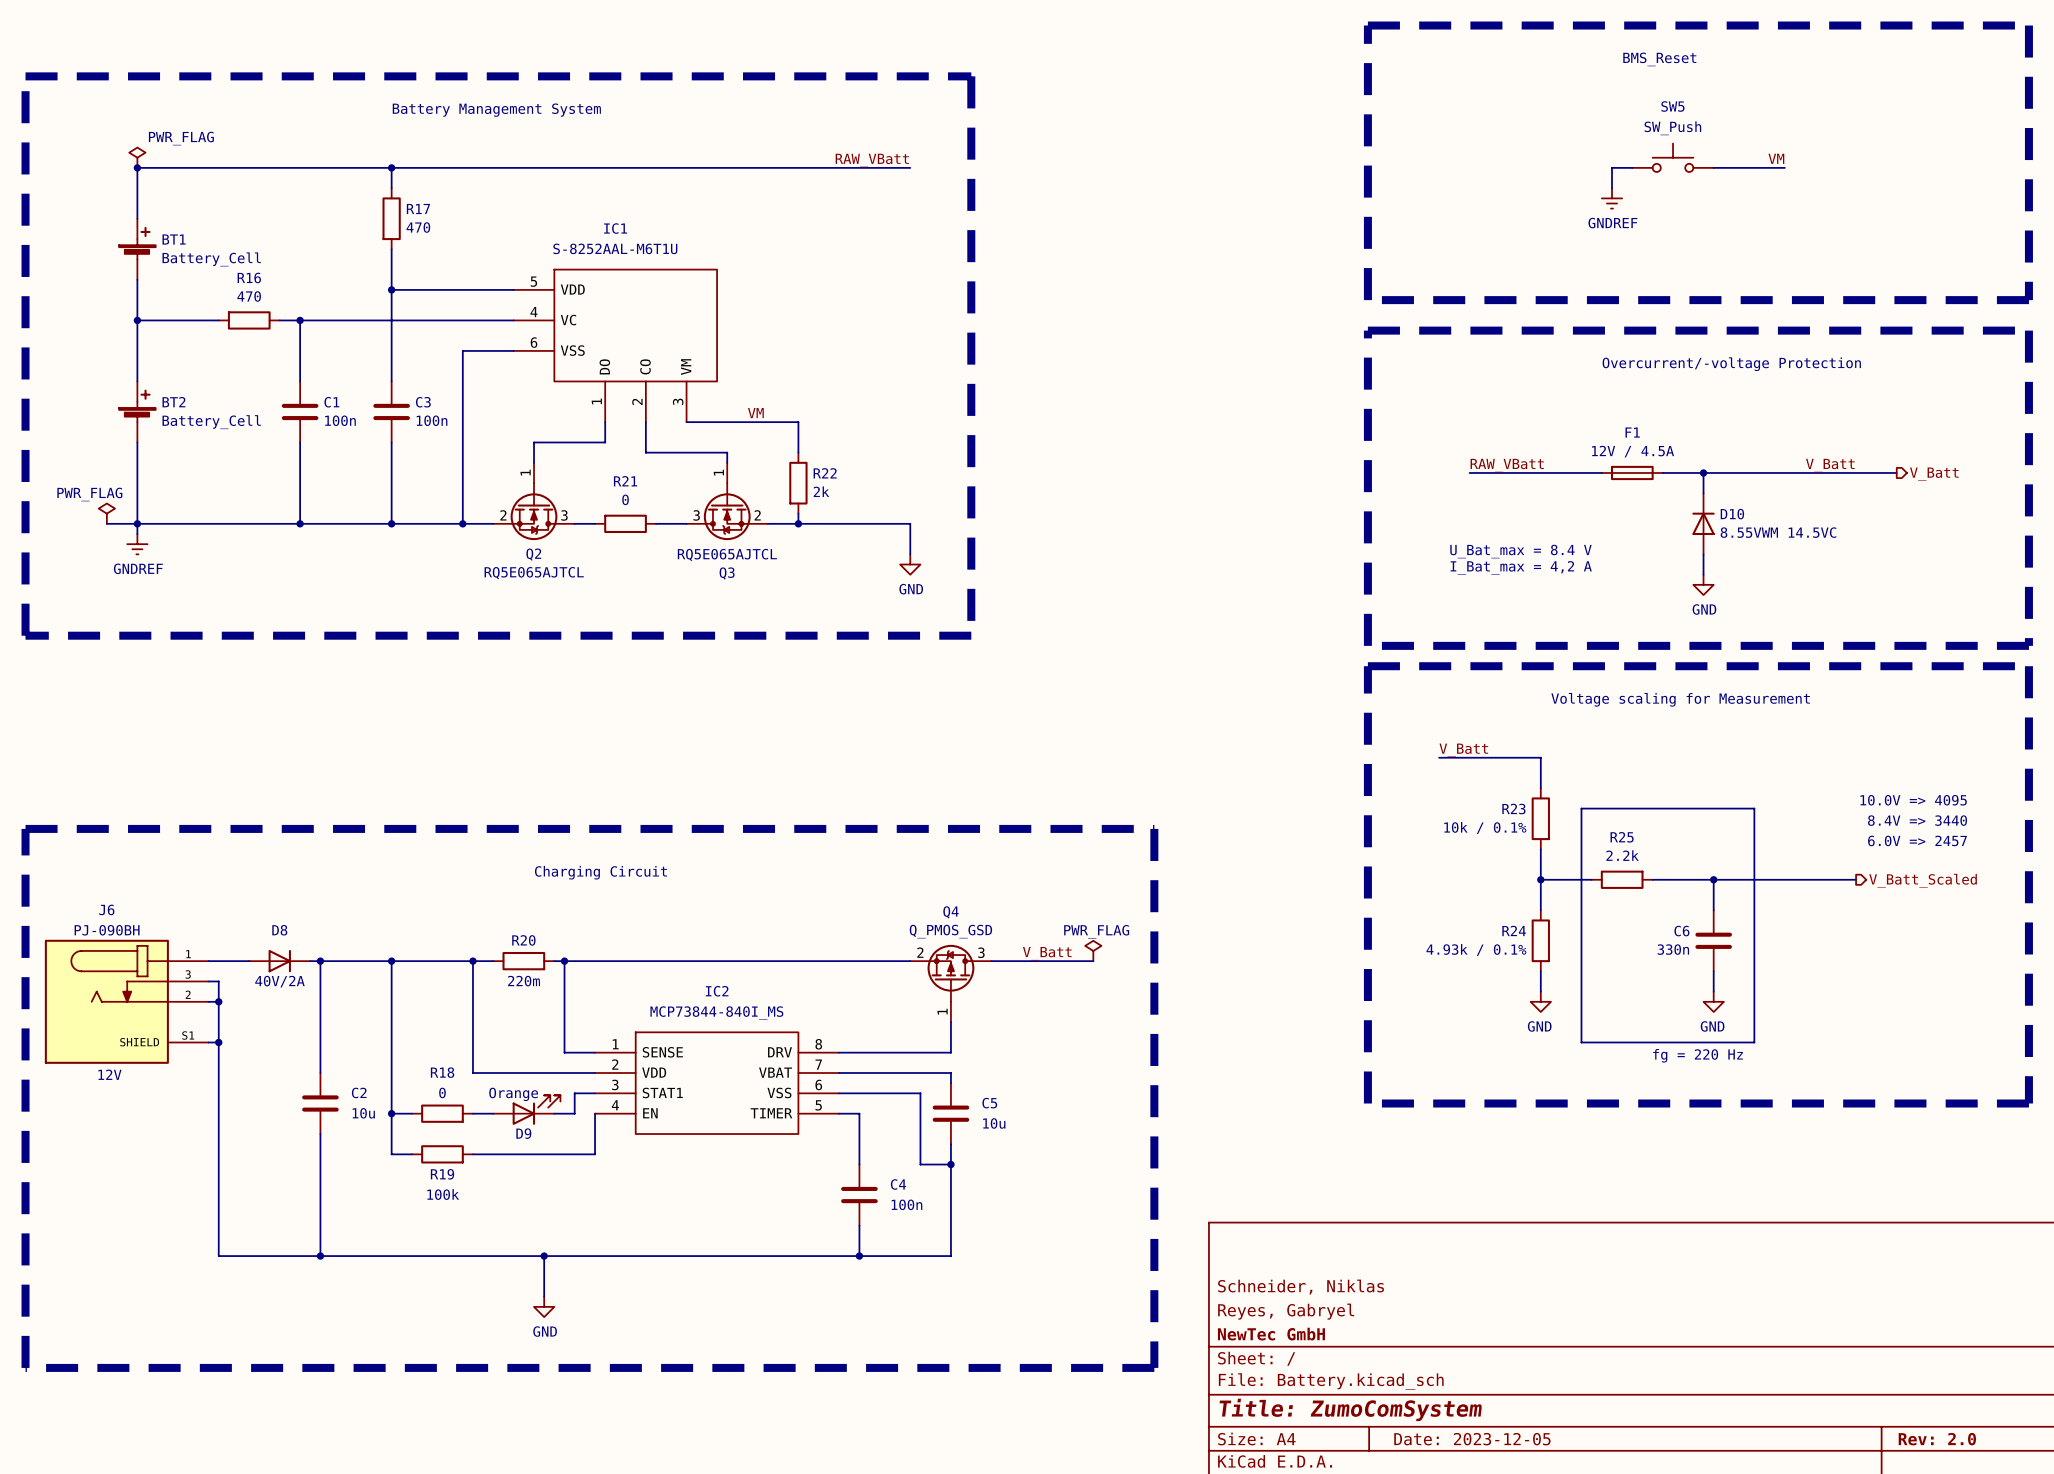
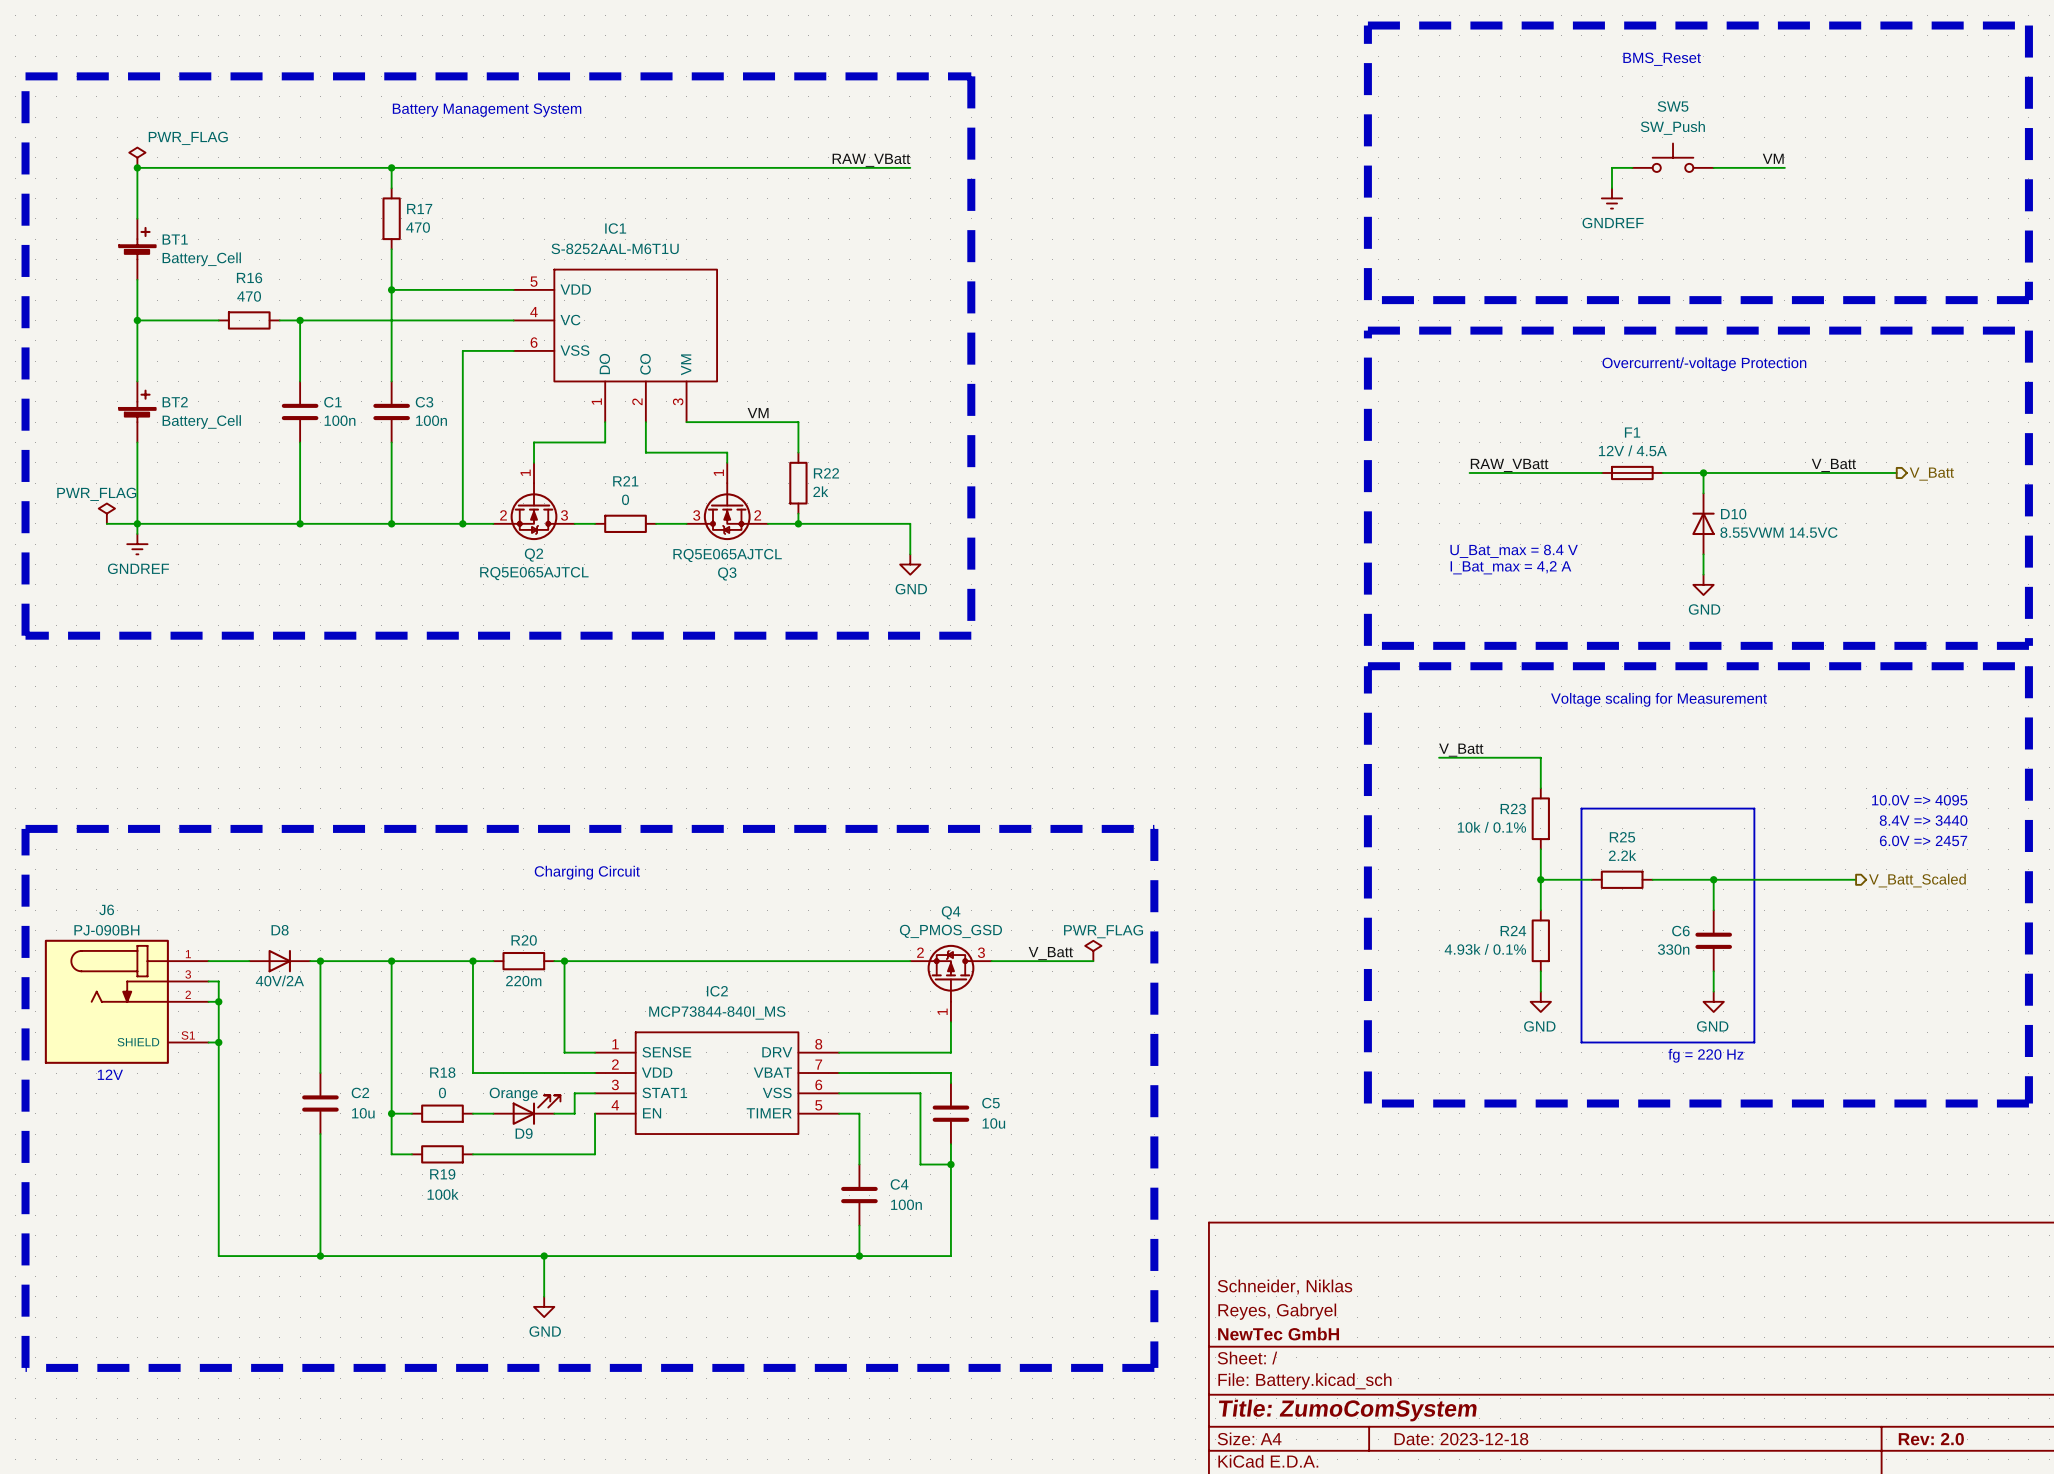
title block: Date: 2023-12-05 (1472, 1439) -> Date: 2023-12-18 (1461, 1439)

